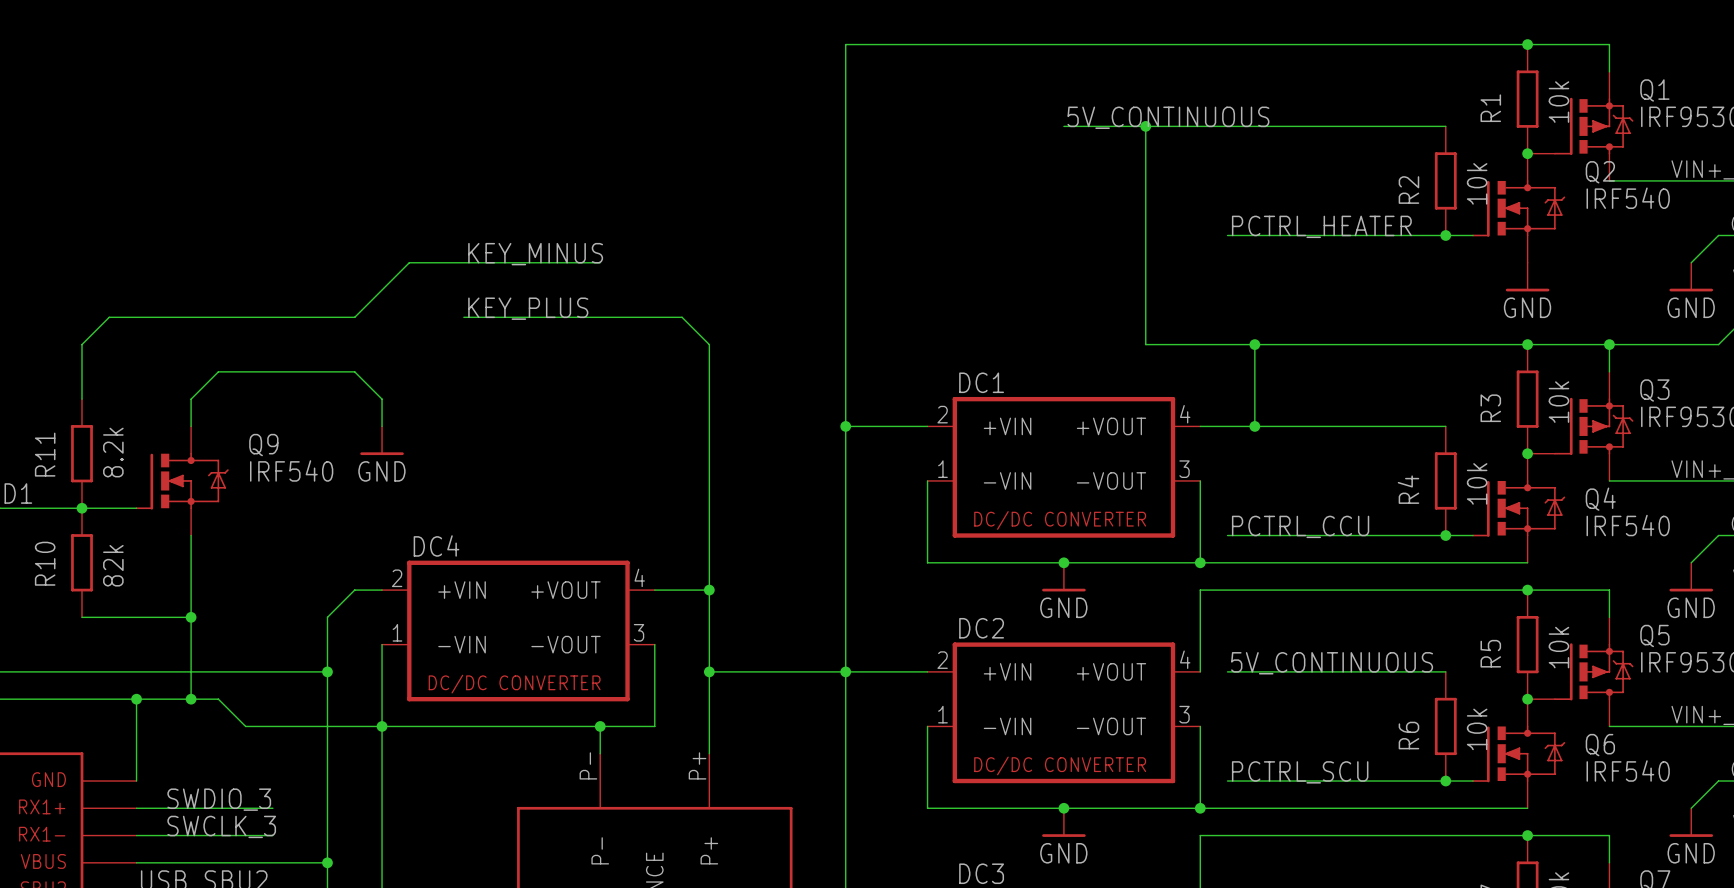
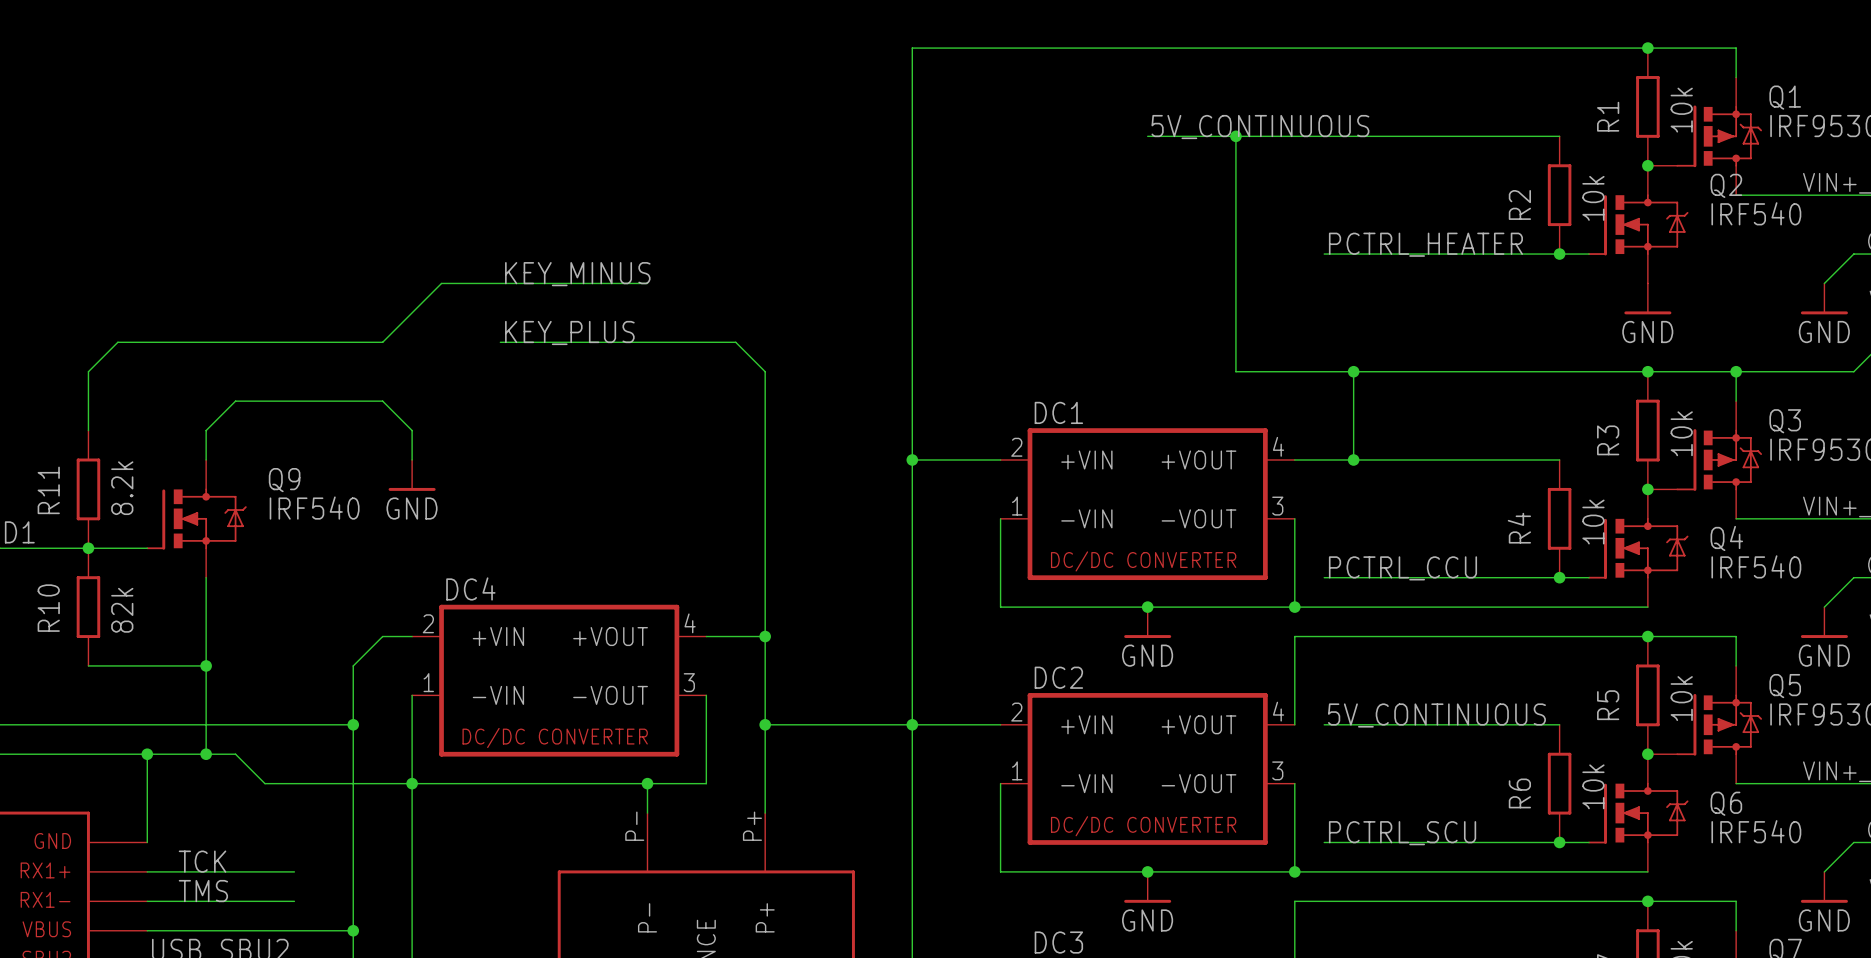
label: SWDIO_3 (219, 799) -> TCK (202, 861)
label: SWCLK_3 (221, 826) -> TMS (203, 891)

